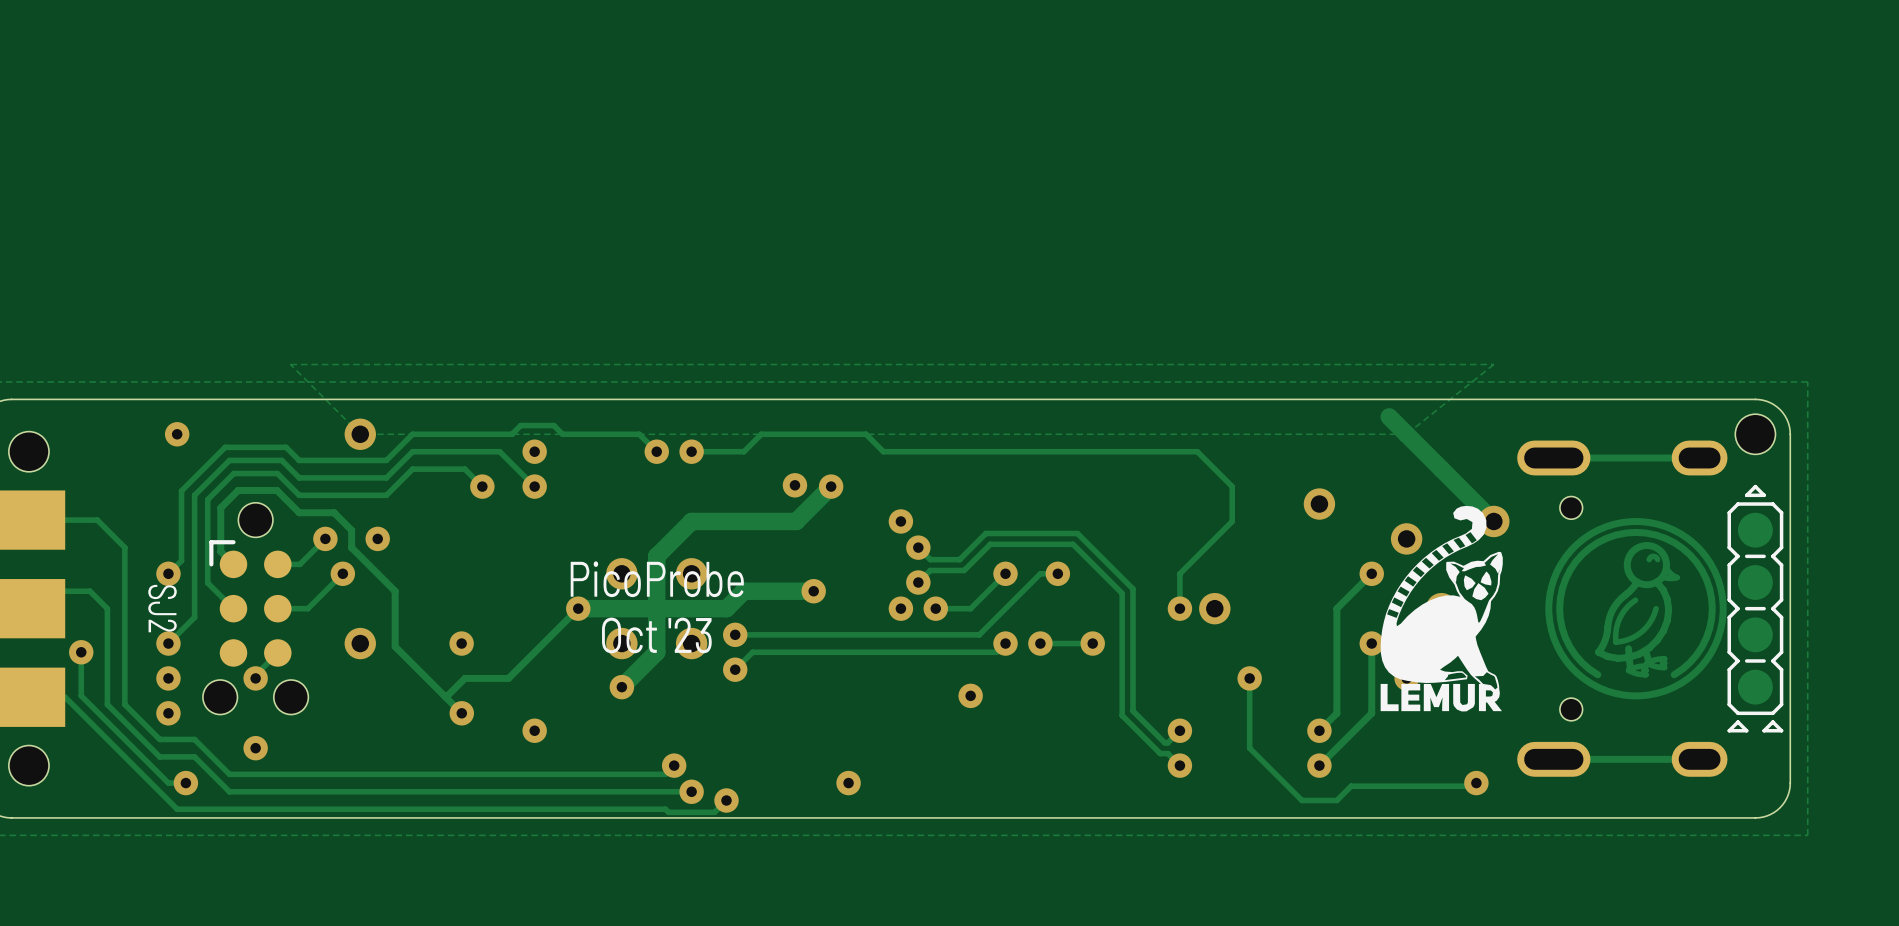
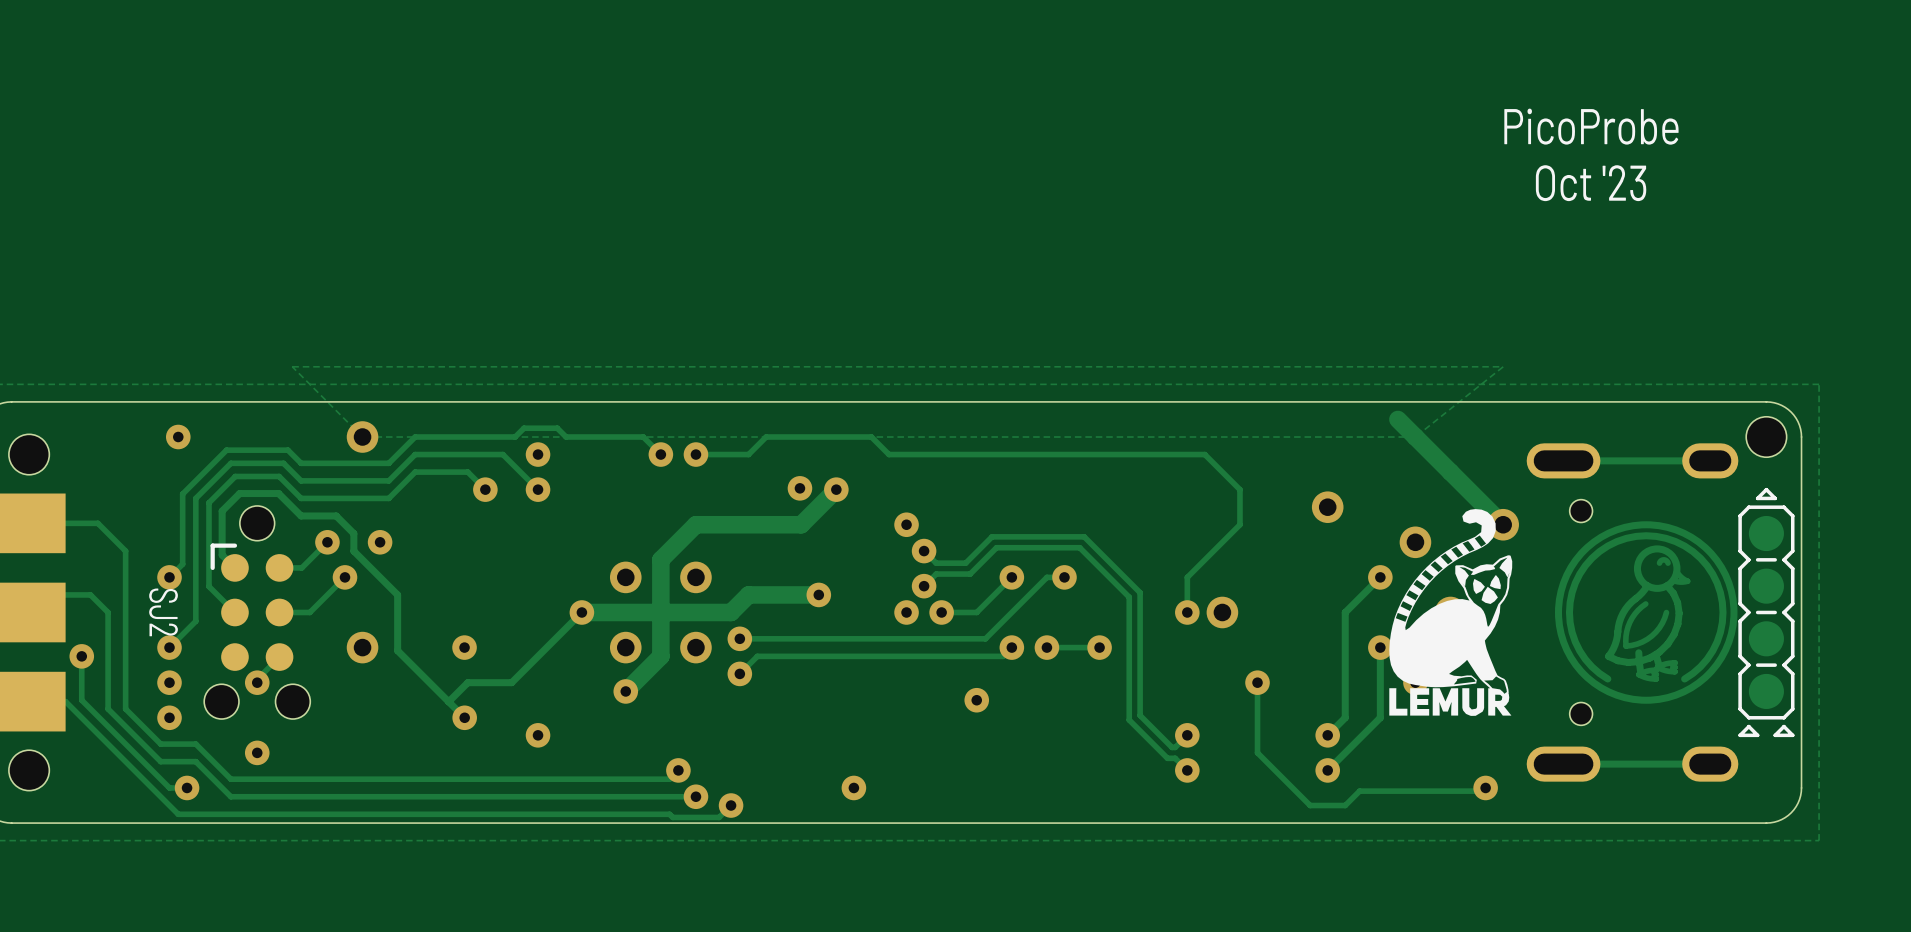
text: none -> PicoProbe (1591, 126)
text: none -> Oct '23 (1591, 183)
text: PicoProbe (657, 579) -> none
text: Oct '23 (656, 635) -> none

